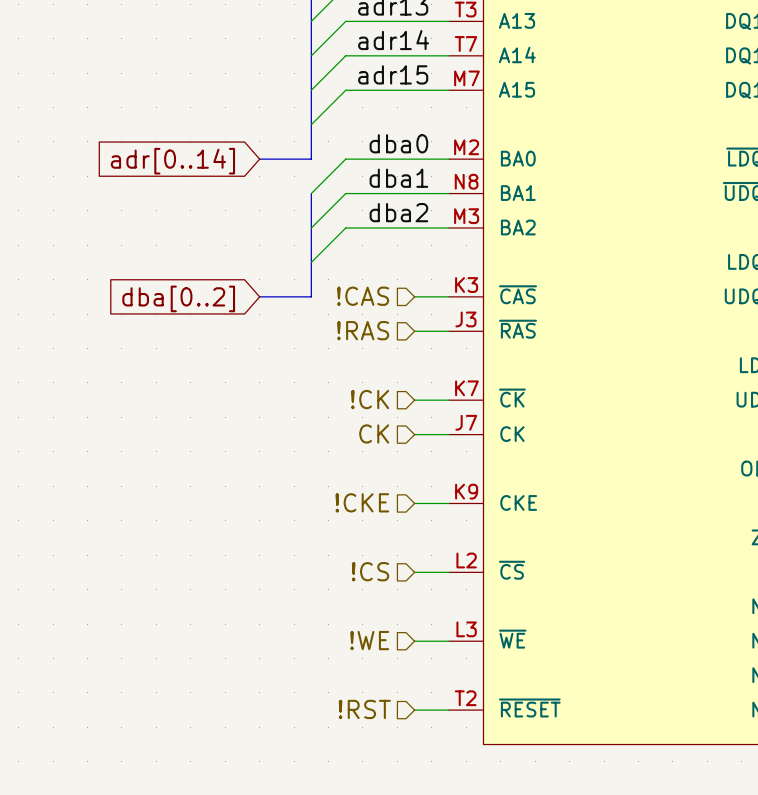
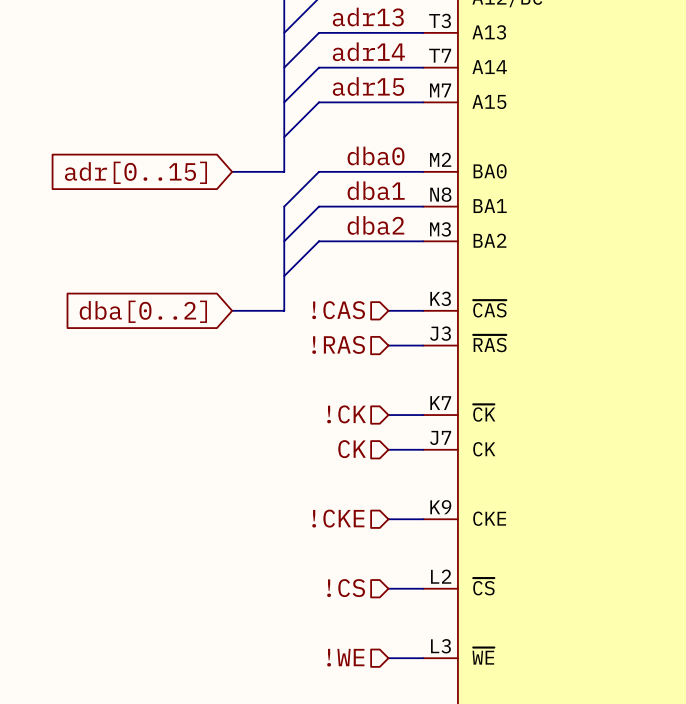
global label: adr[0..14] (172, 161) -> adr[0..15] (135, 172)

